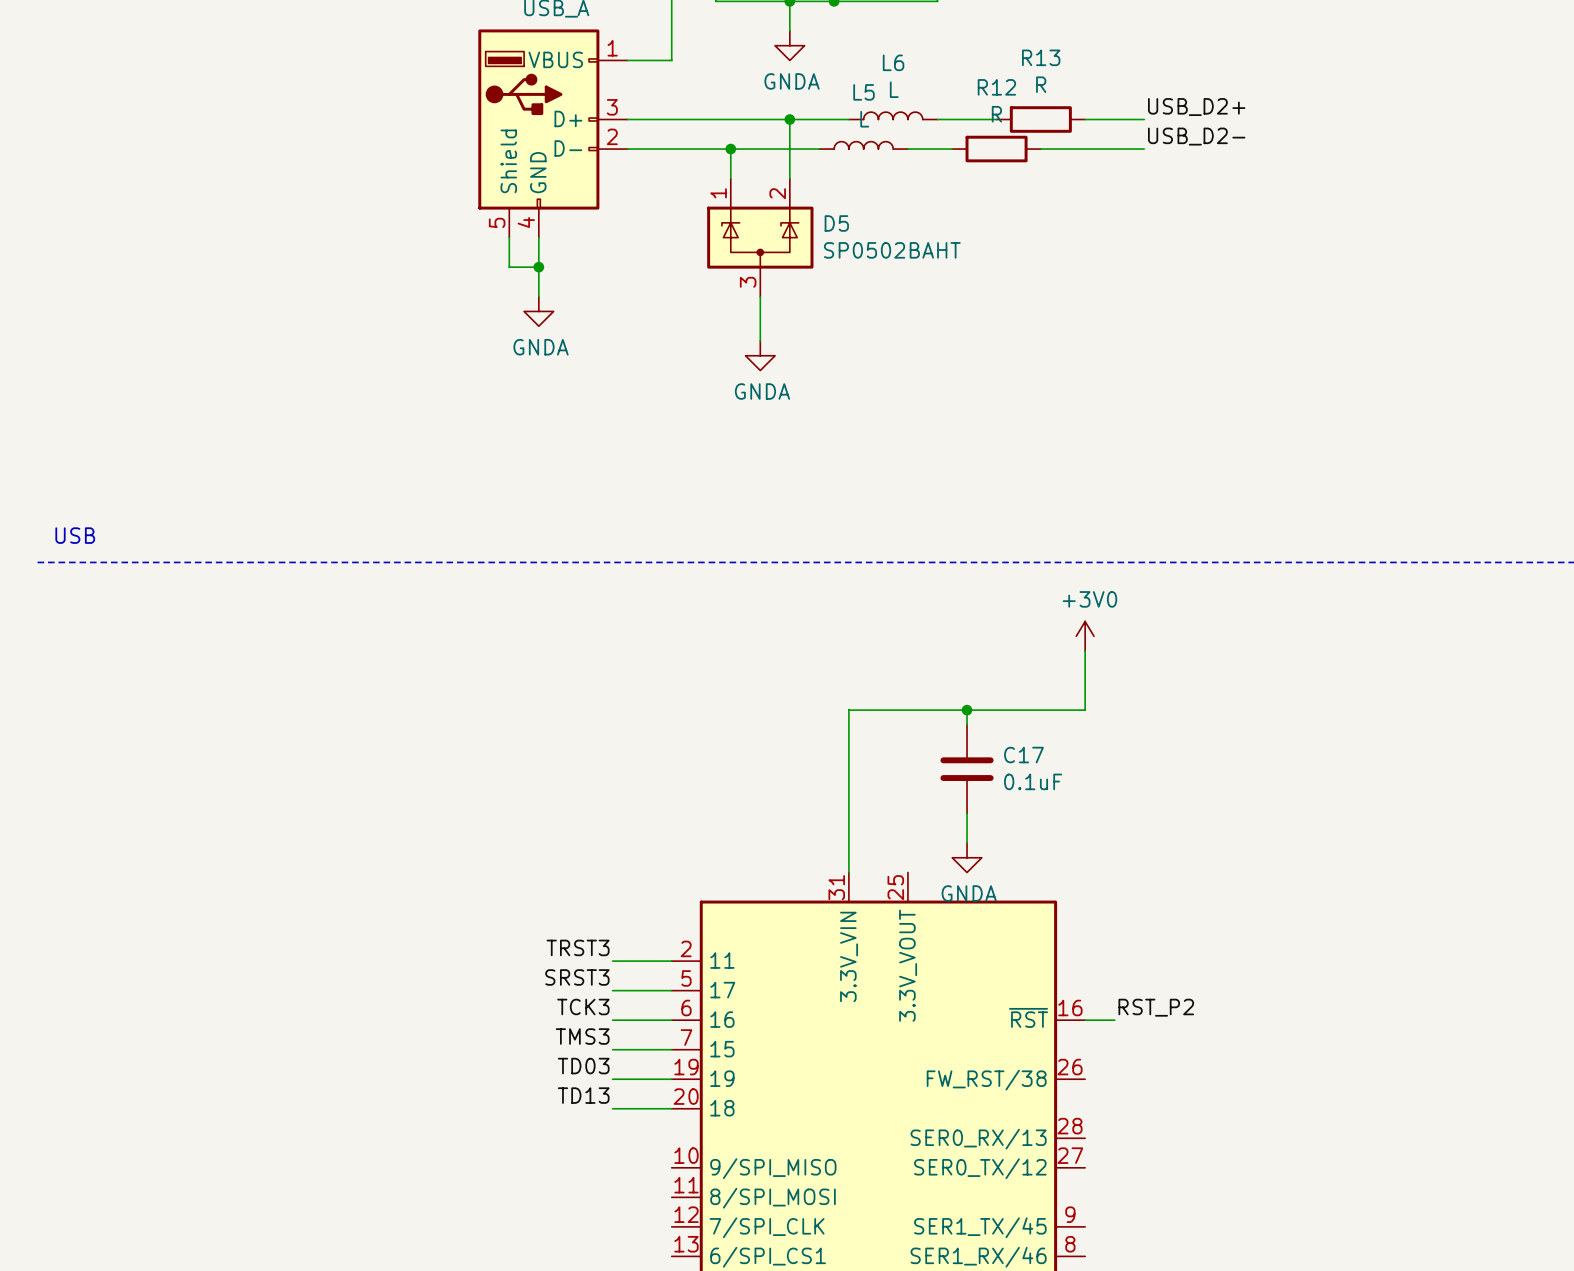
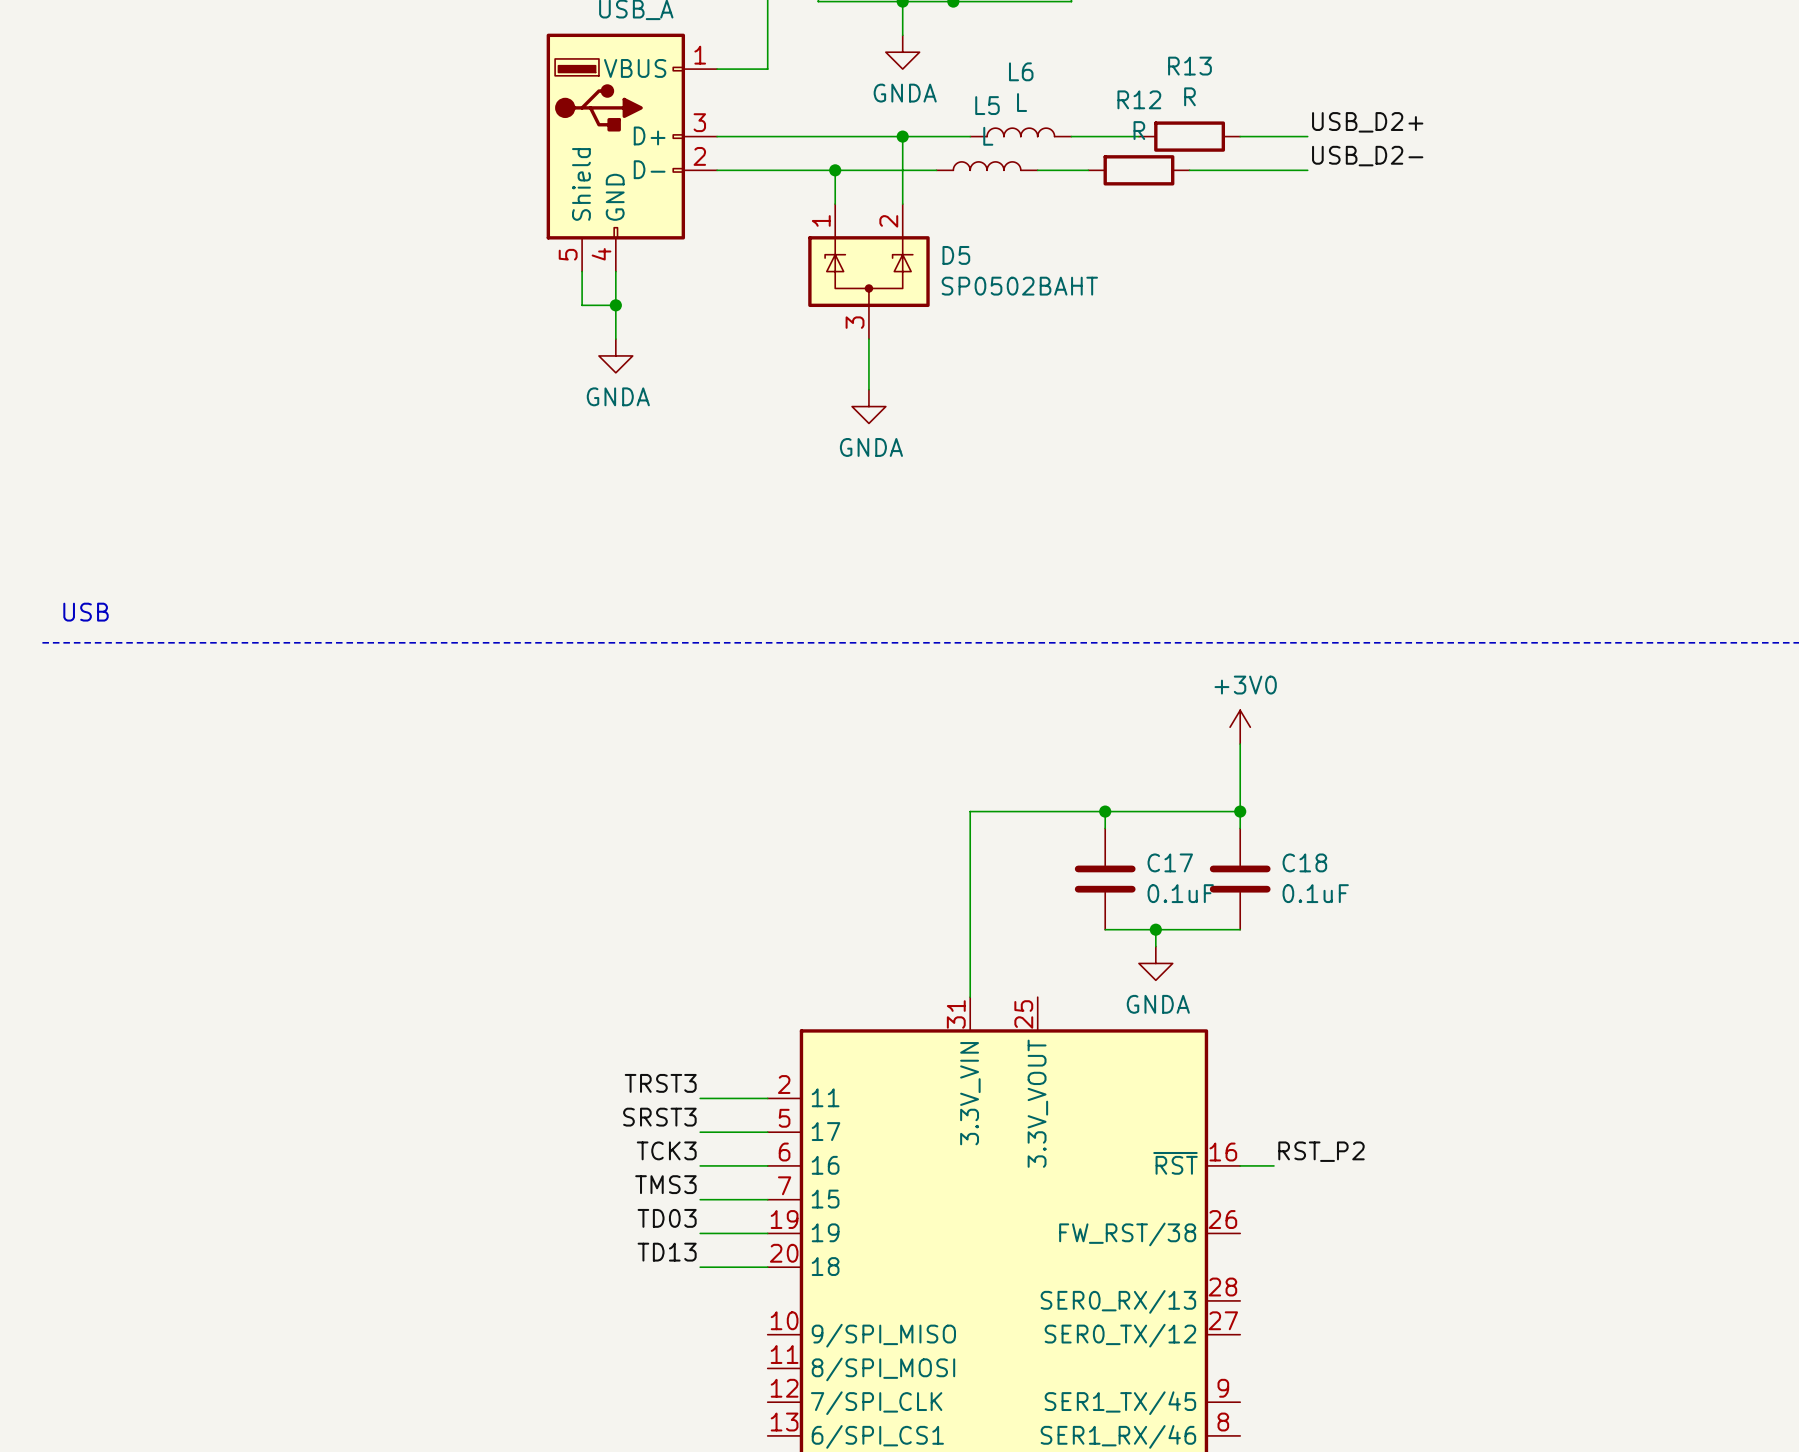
wire: none -> (1240, 811) (1240, 828)
junction: none -> (1240, 811)
C18: none -> 0.1uF (1240, 879)
wire: (967, 813) (967, 842) -> (1105, 929) (1240, 929)
wire: none -> (1155, 929) (1155, 946)
junction: none -> (1155, 929)
power symbol position: GNDA (967, 857) -> GNDA (1155, 963)

